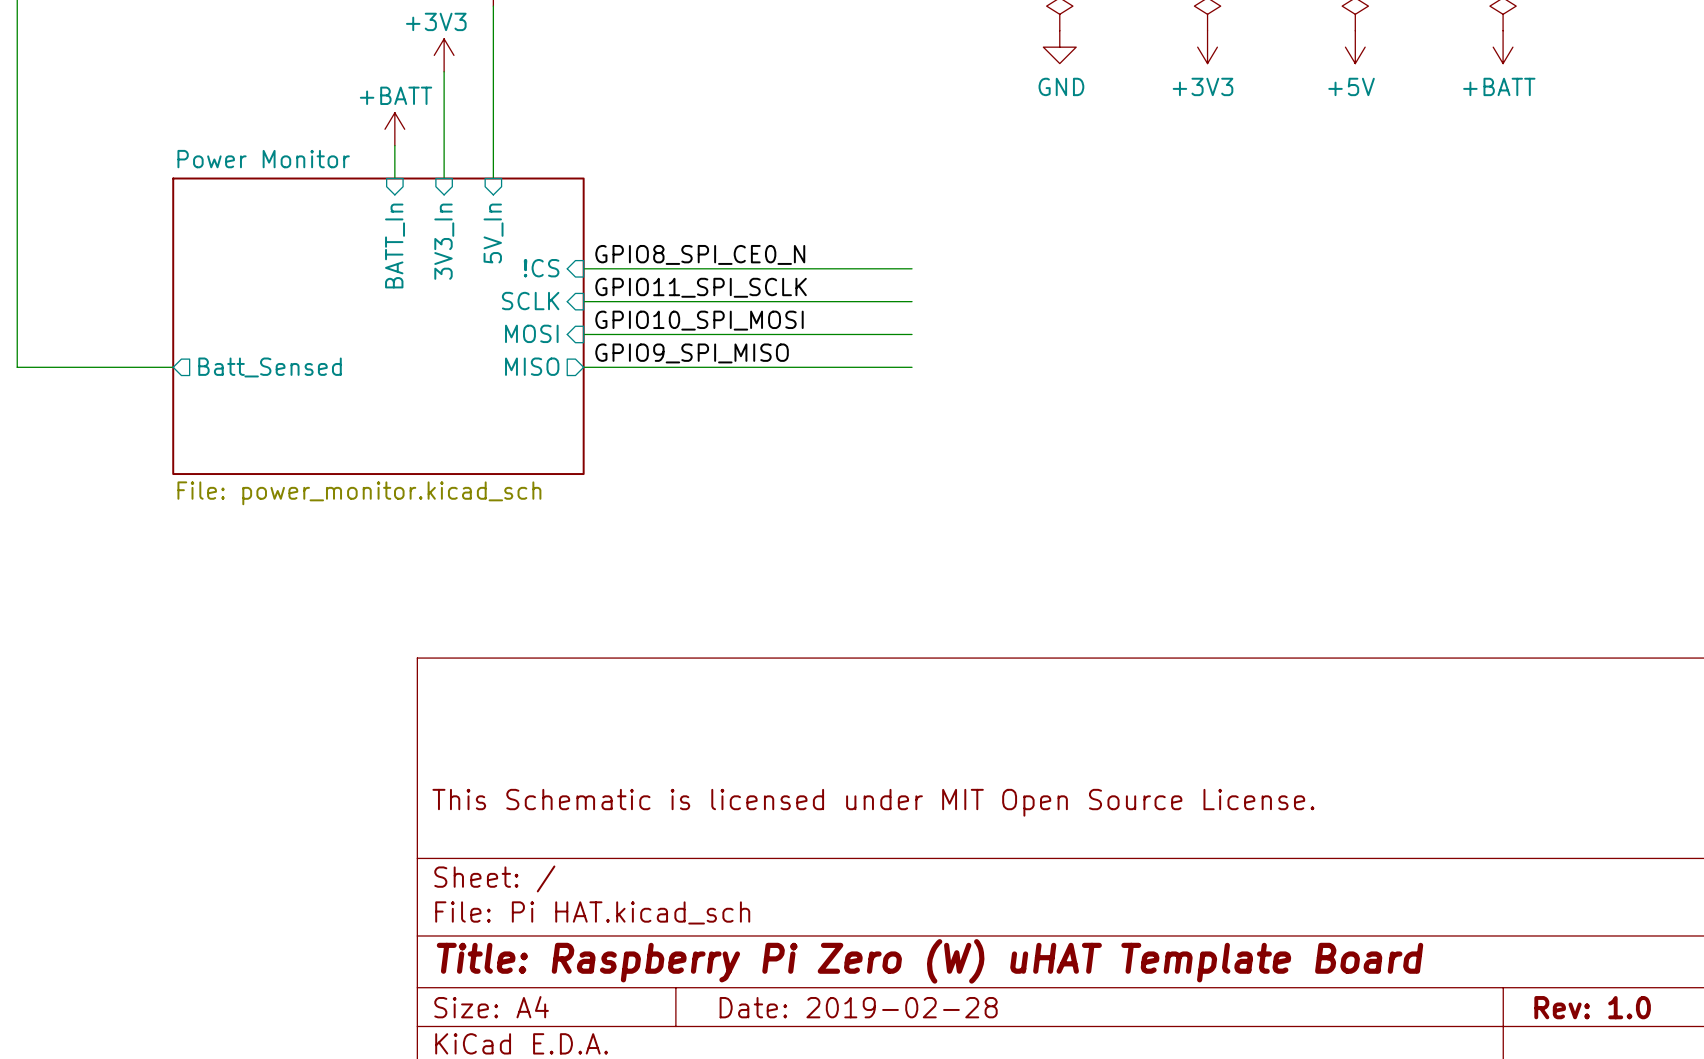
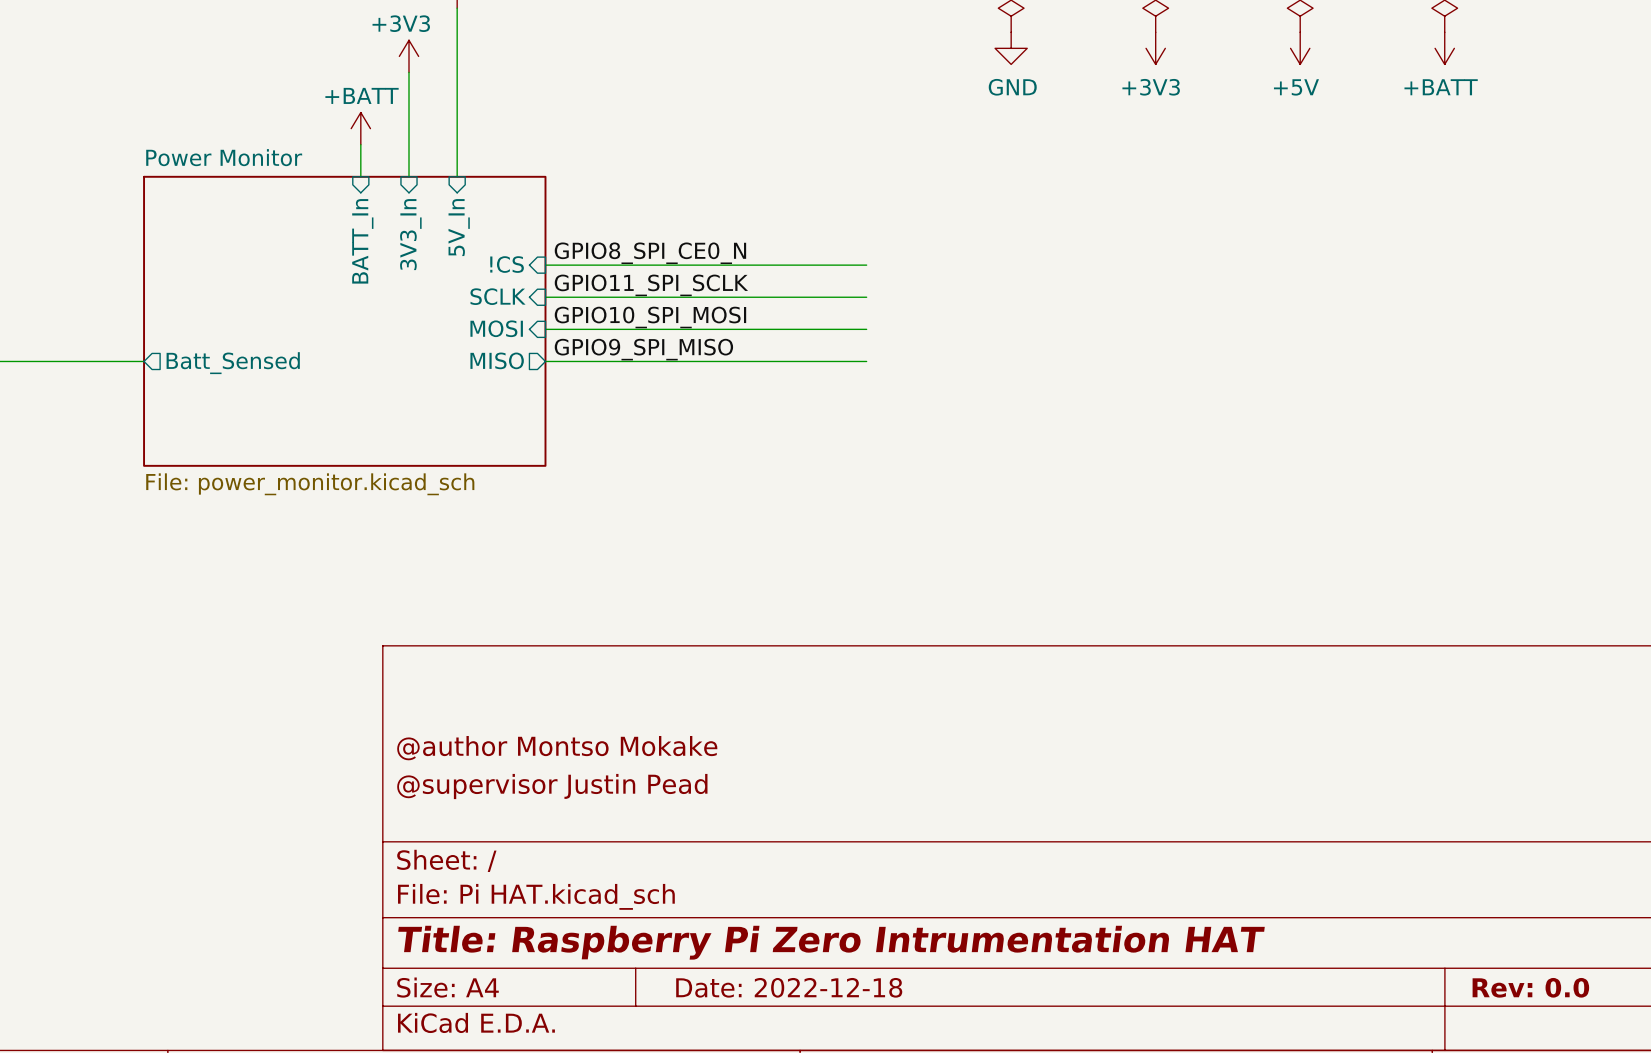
title block: none -> @author Montso Mokake (557, 748)
title block: This Schematic is licensed under MIT Open Source License. (873, 802) -> @supervisor Justin Pead (552, 786)
title block: Title: Raspberry Pi Zero (W) uHAT Template Board (930, 961) -> Title: Raspberry Pi Zero Intrumentation HAT (831, 942)
title block: Date: 2019-02-28 (858, 1007) -> Date: 2022-12-18 (789, 987)
title block: Rev: 1.0 (1592, 1007) -> Rev: 0.0 (1530, 987)

